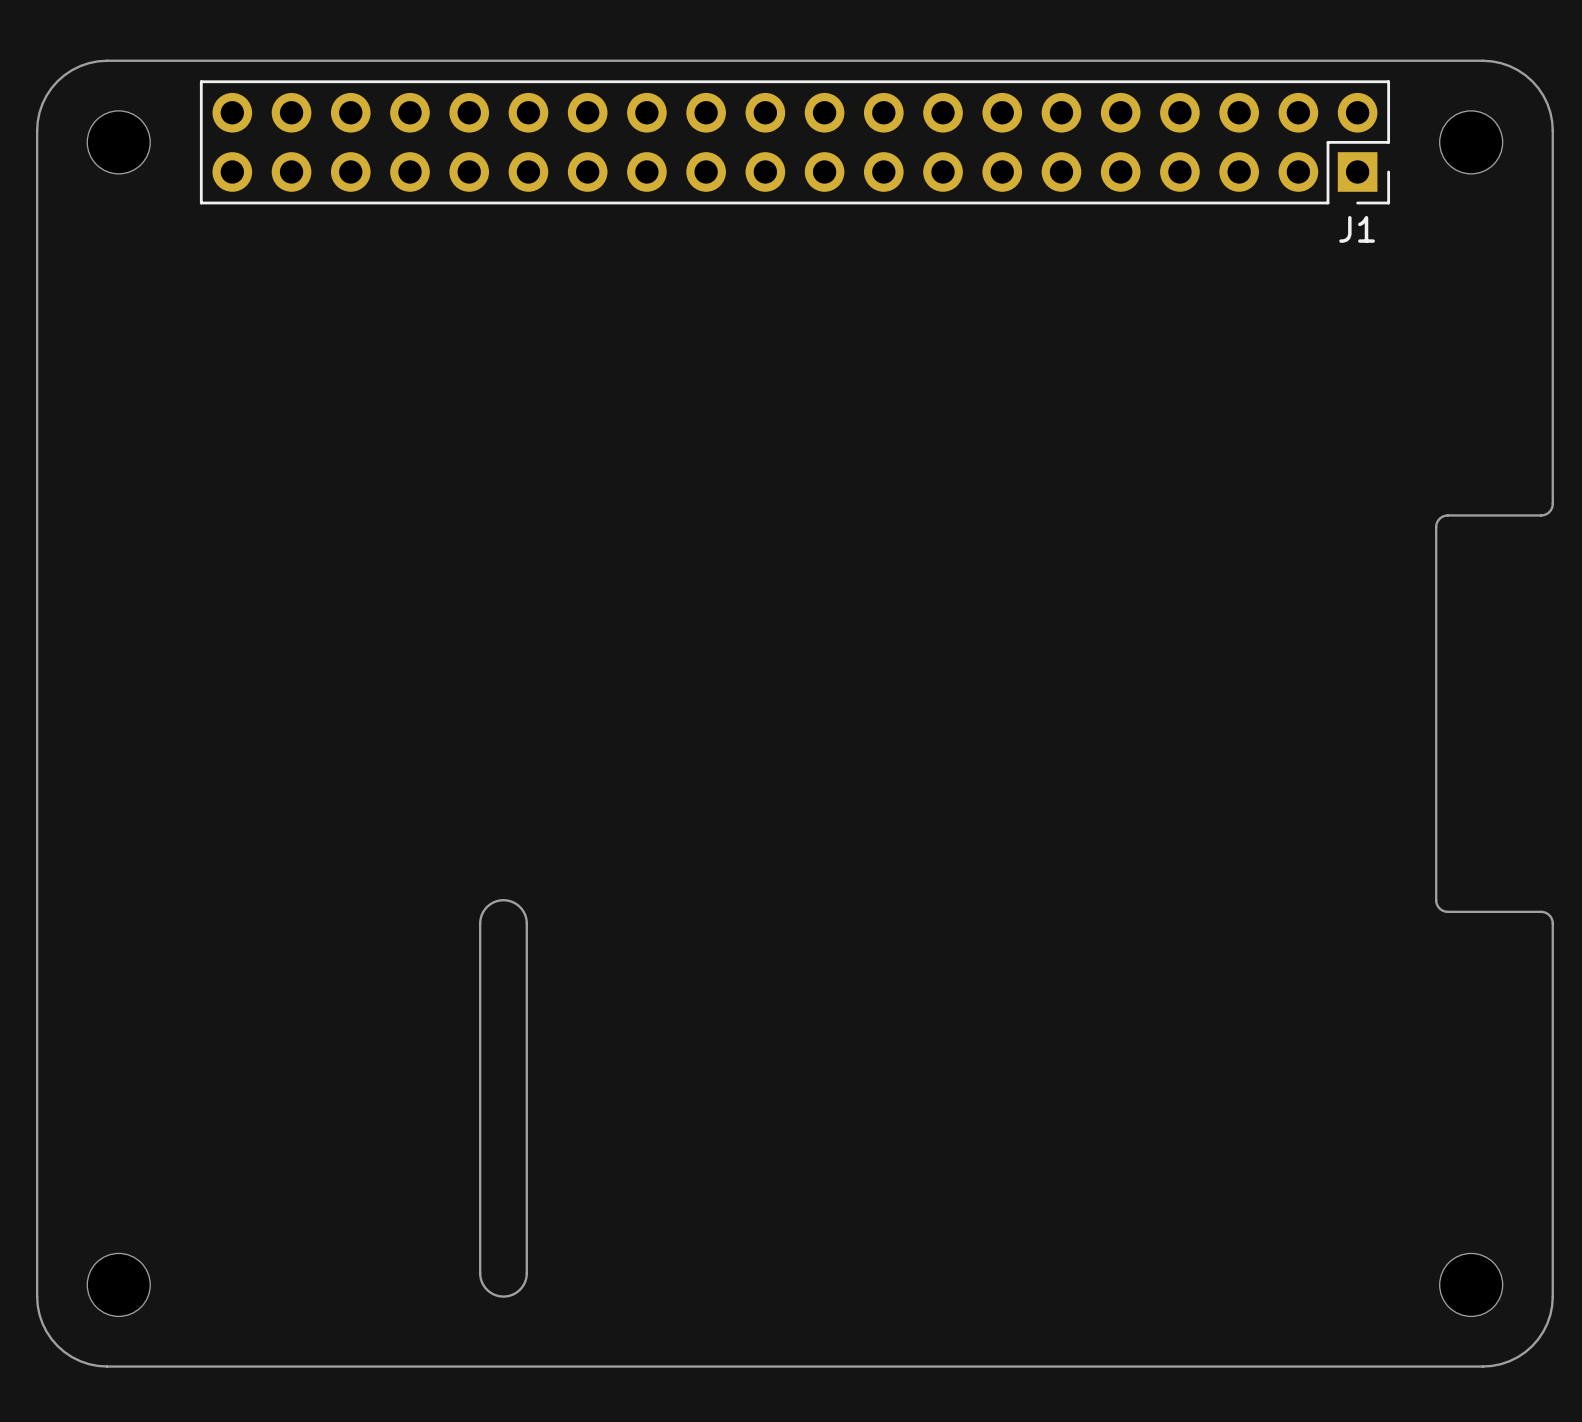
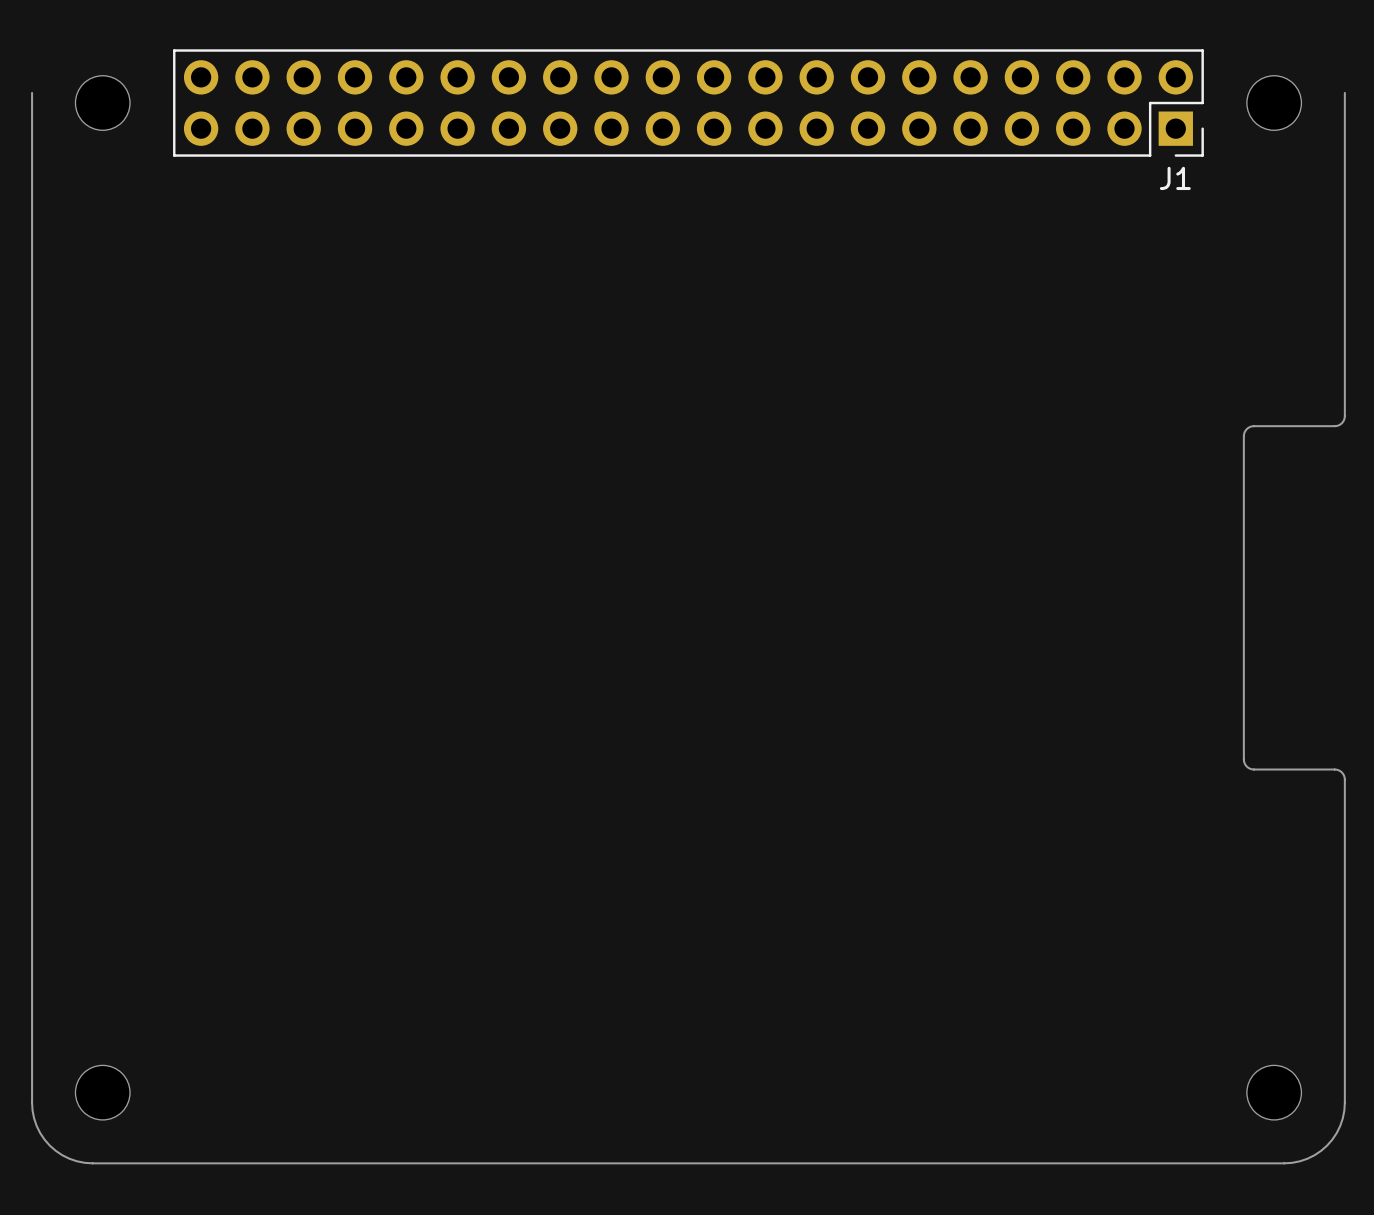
board edge: (1552, 130) (1547, 103) (1532, 81) (1509, 66) (1482, 60) (107, 60) (80, 66) (57, 81) (42, 103) (37, 130) -> none
board edge: (526, 923) (526, 1276) (523, 1284) (517, 1291) (509, 1295) (500, 1296) (491, 1293) (484, 1287) (480, 1273) (480, 920) (487, 907) (494, 901) (503, 900) (512, 901) (519, 907) (525, 914) (526, 923) -> none

